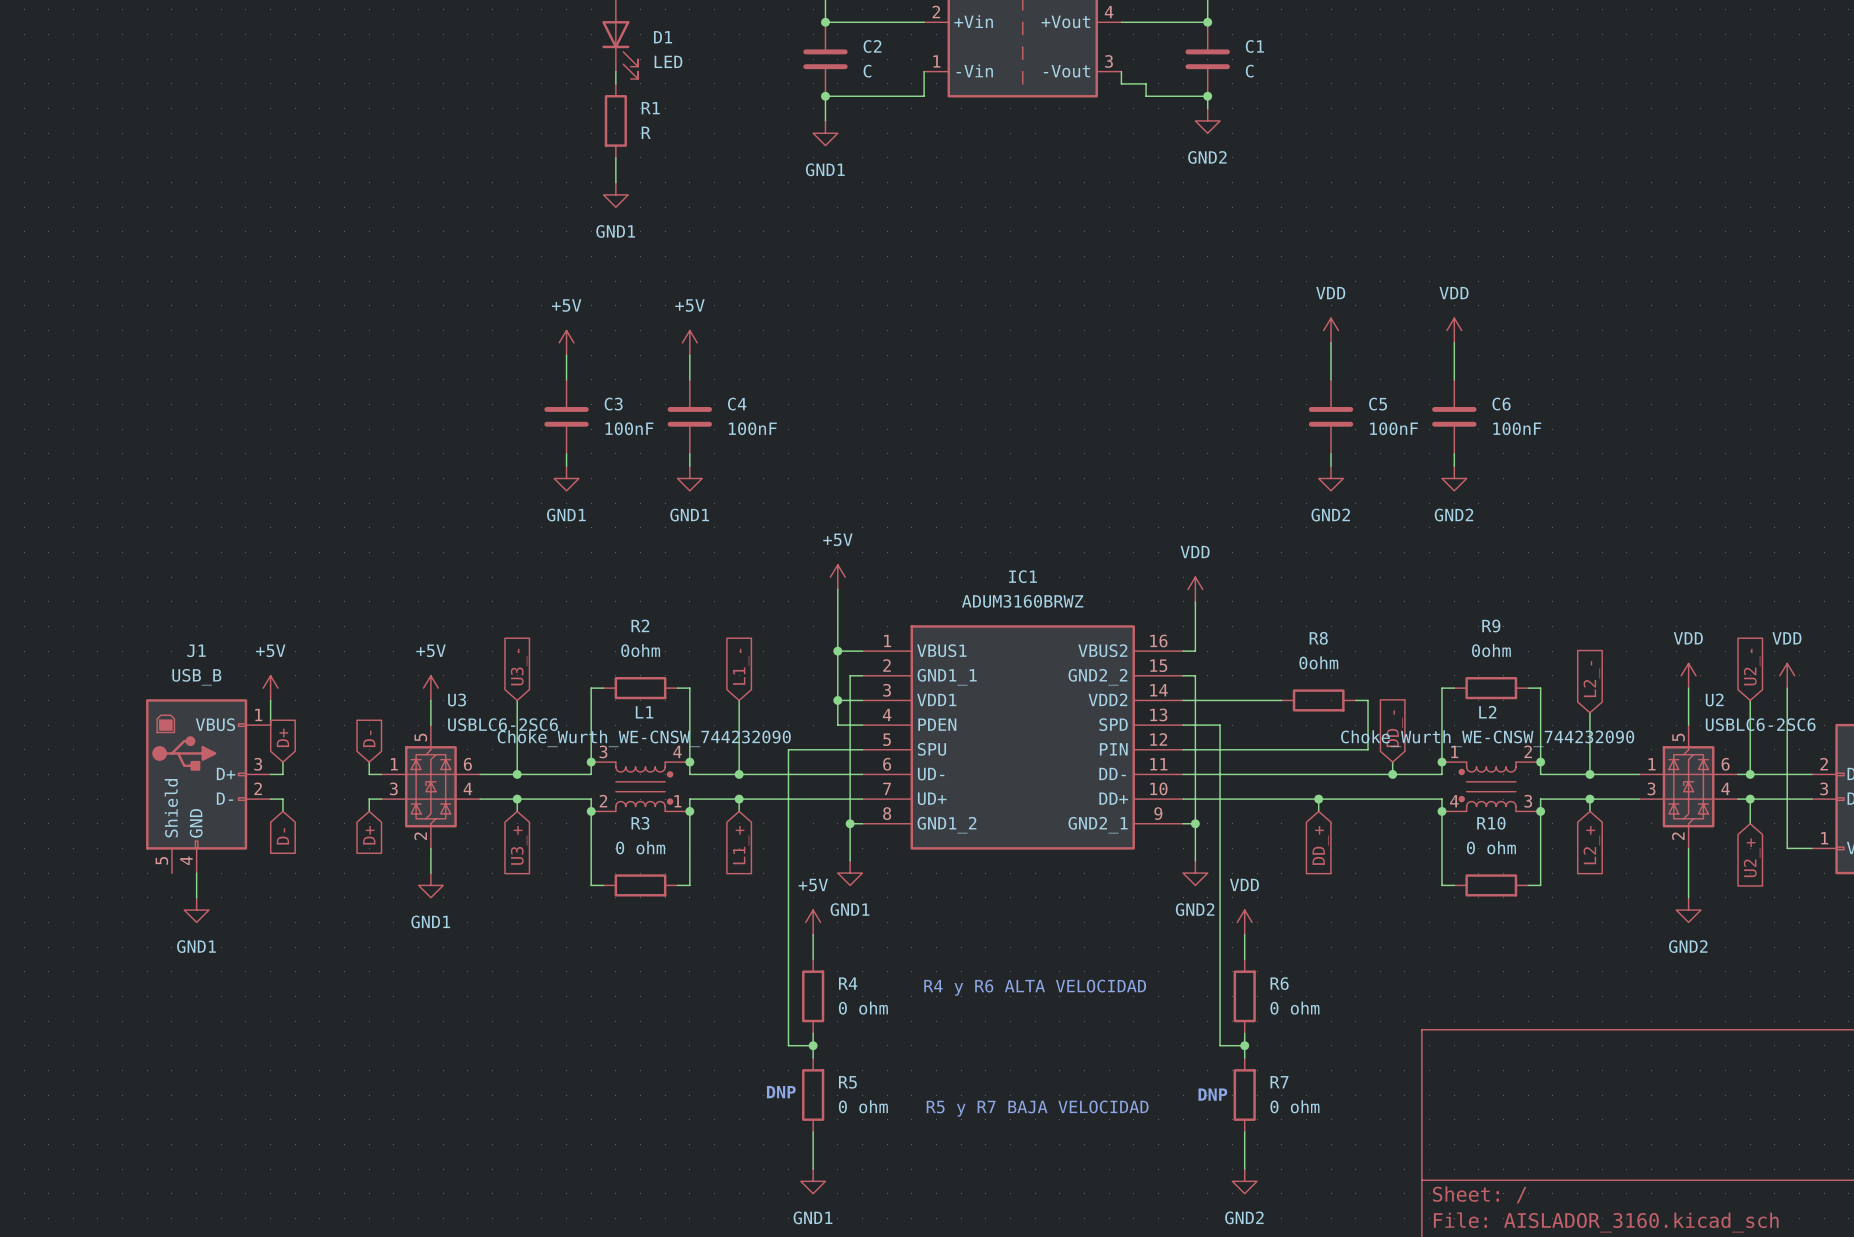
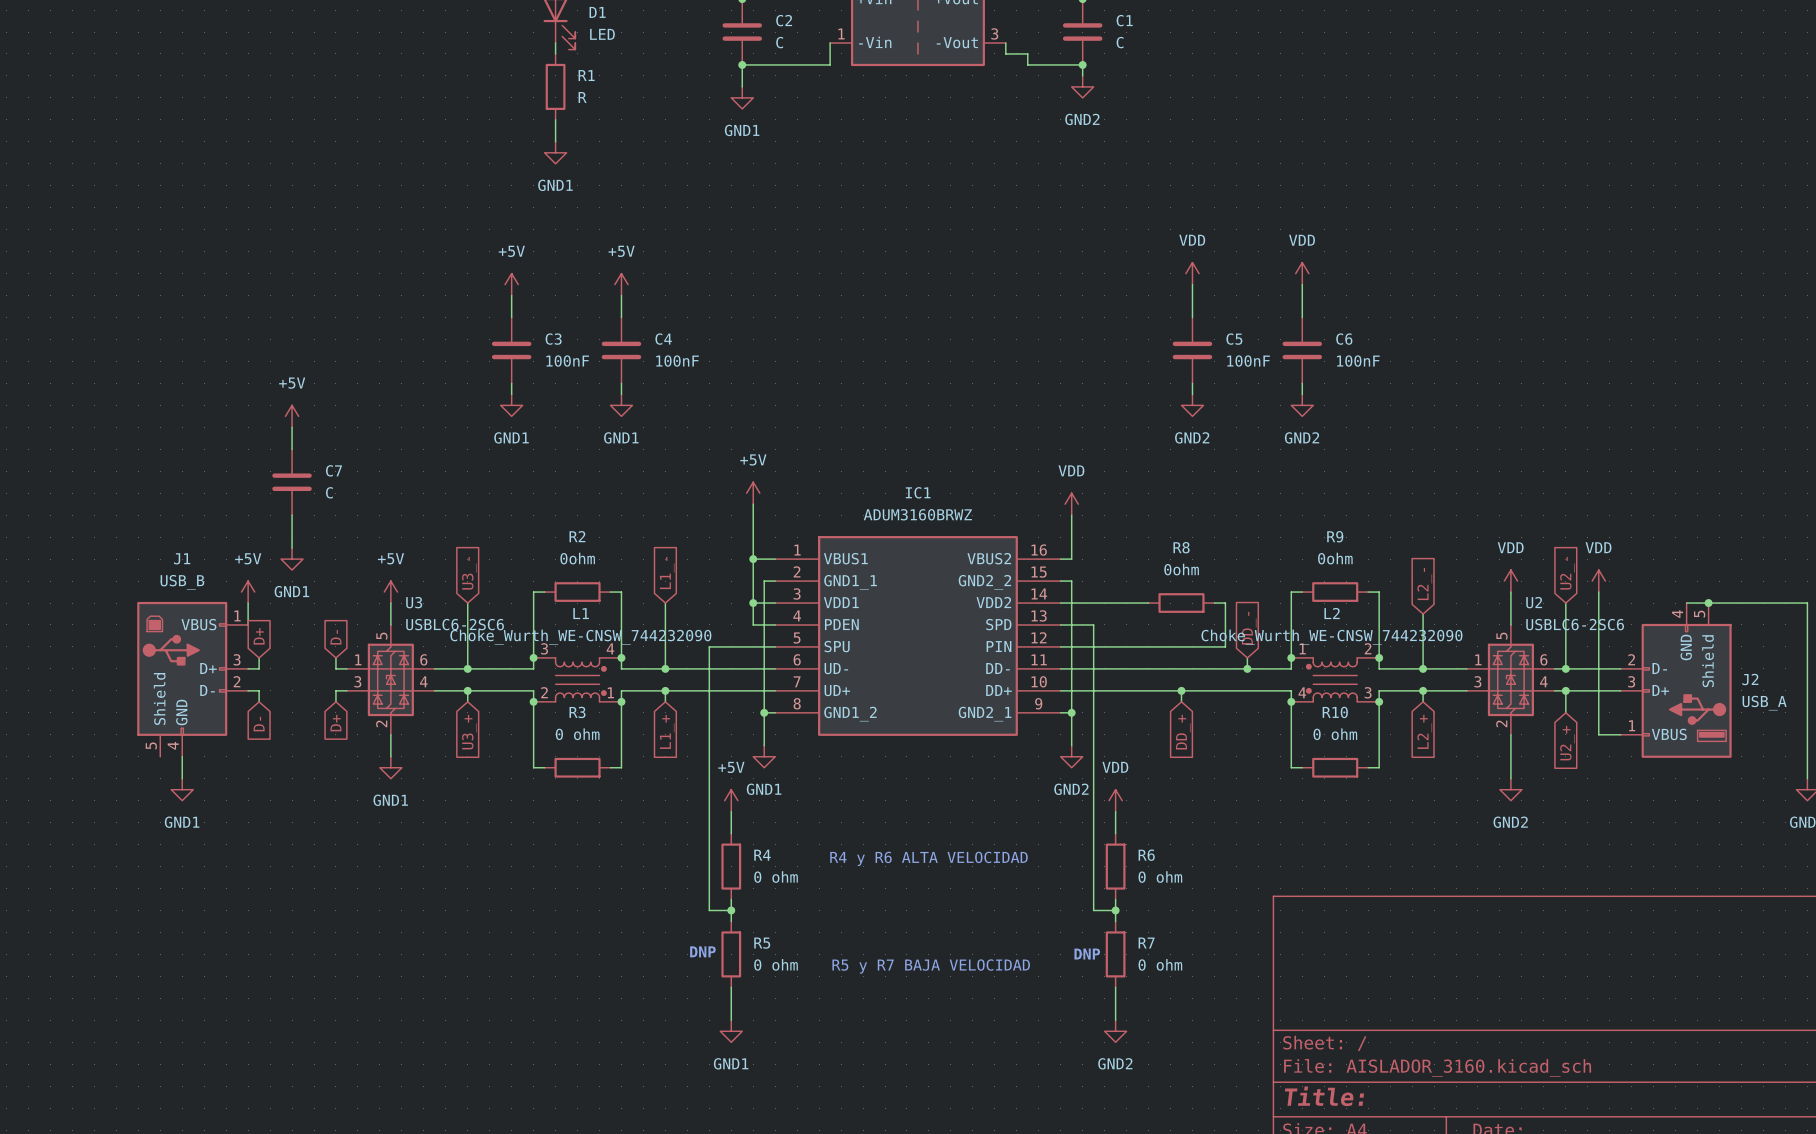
power symbol: none -> +5V (292, 416)
wire: none -> (292, 427) (292, 449)
C7: none -> C (292, 482)
wire: none -> (292, 515) (292, 548)
power symbol: none -> GND1 (292, 559)

